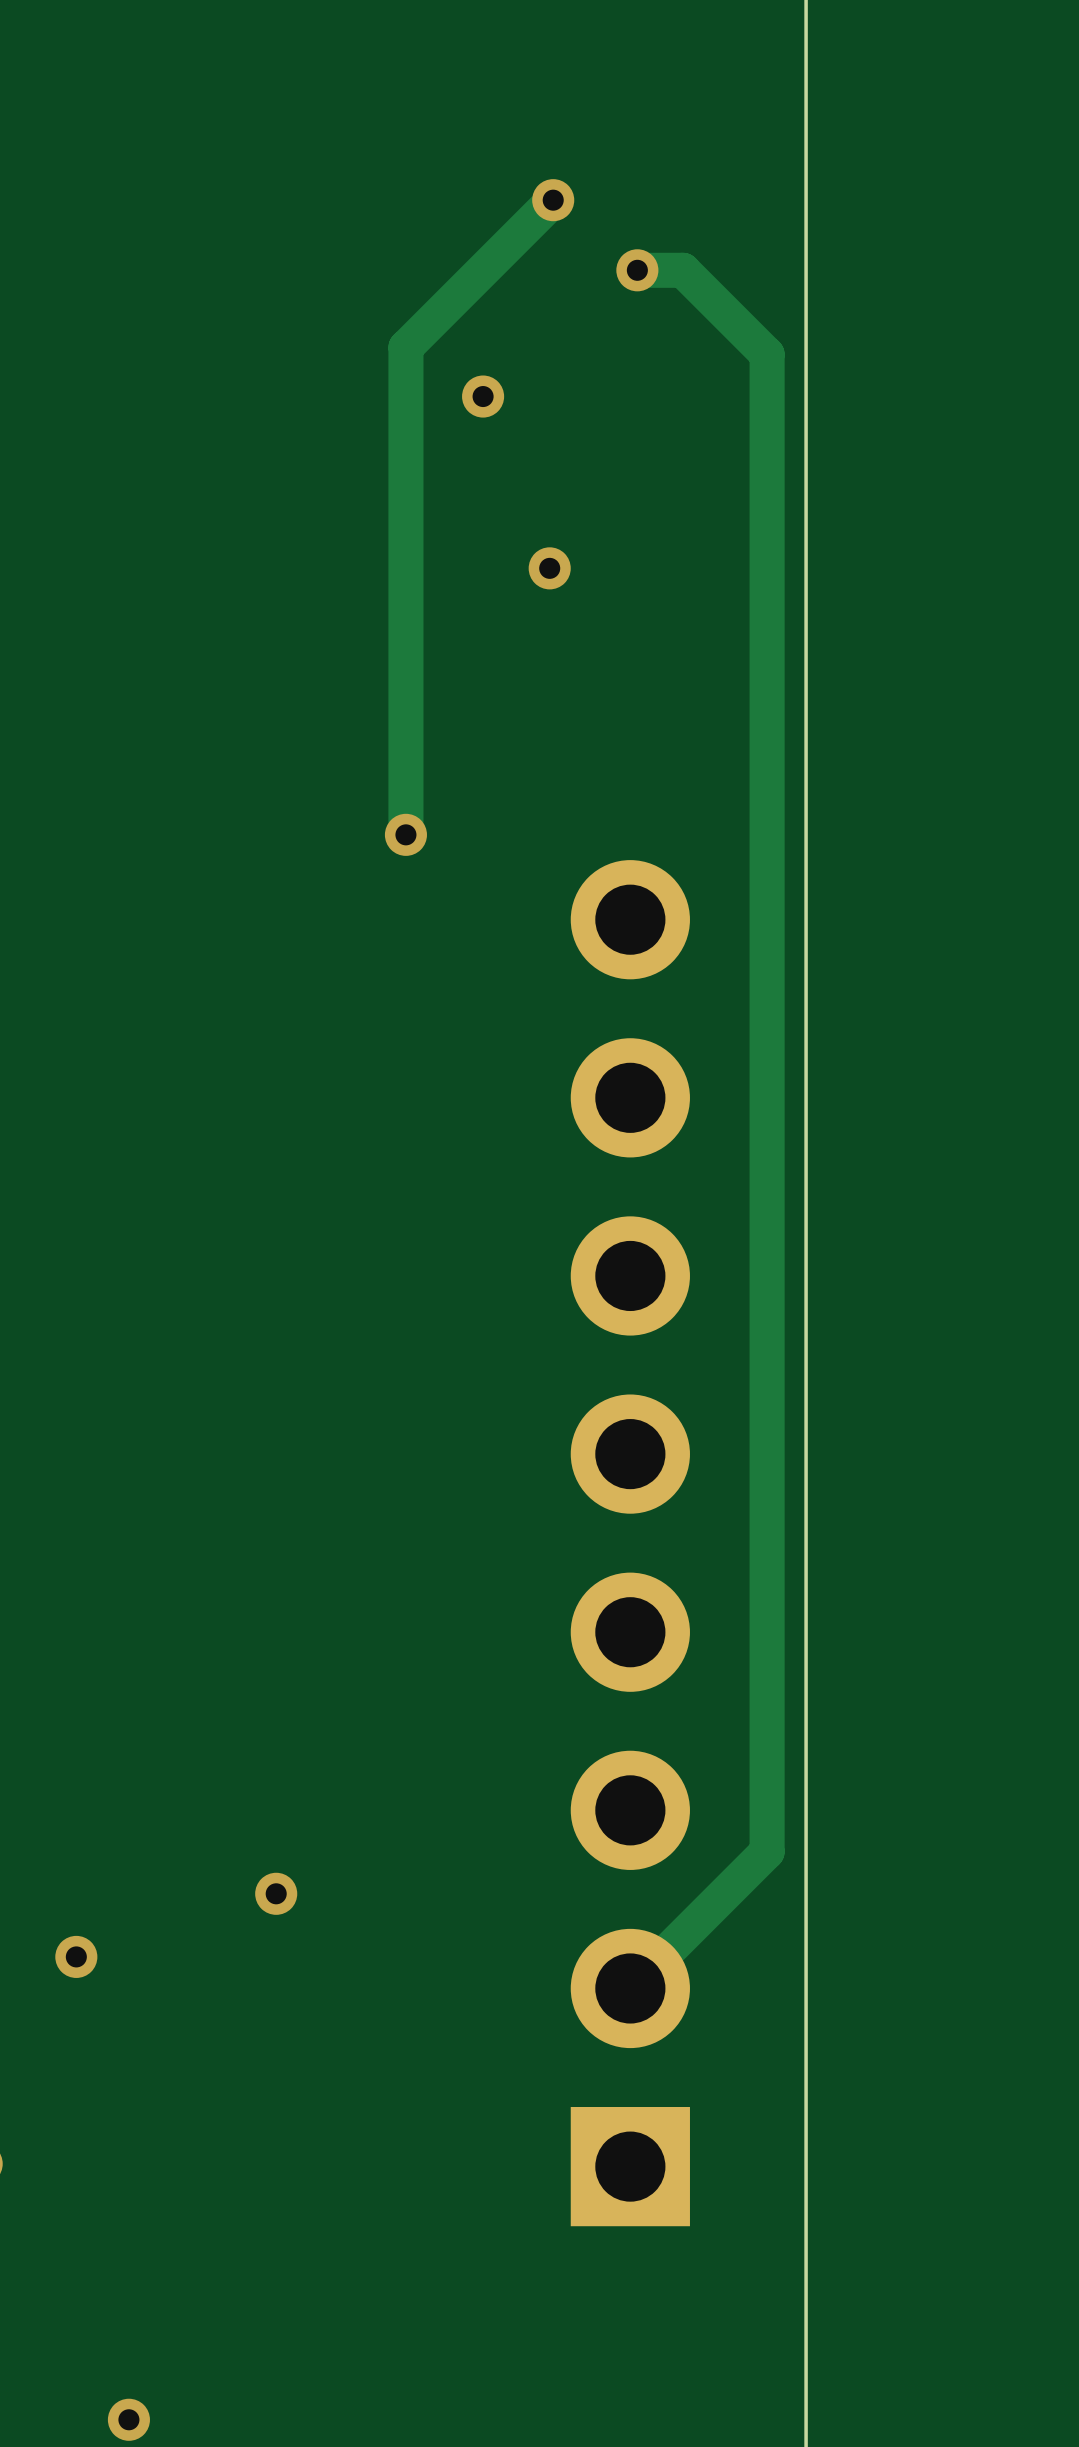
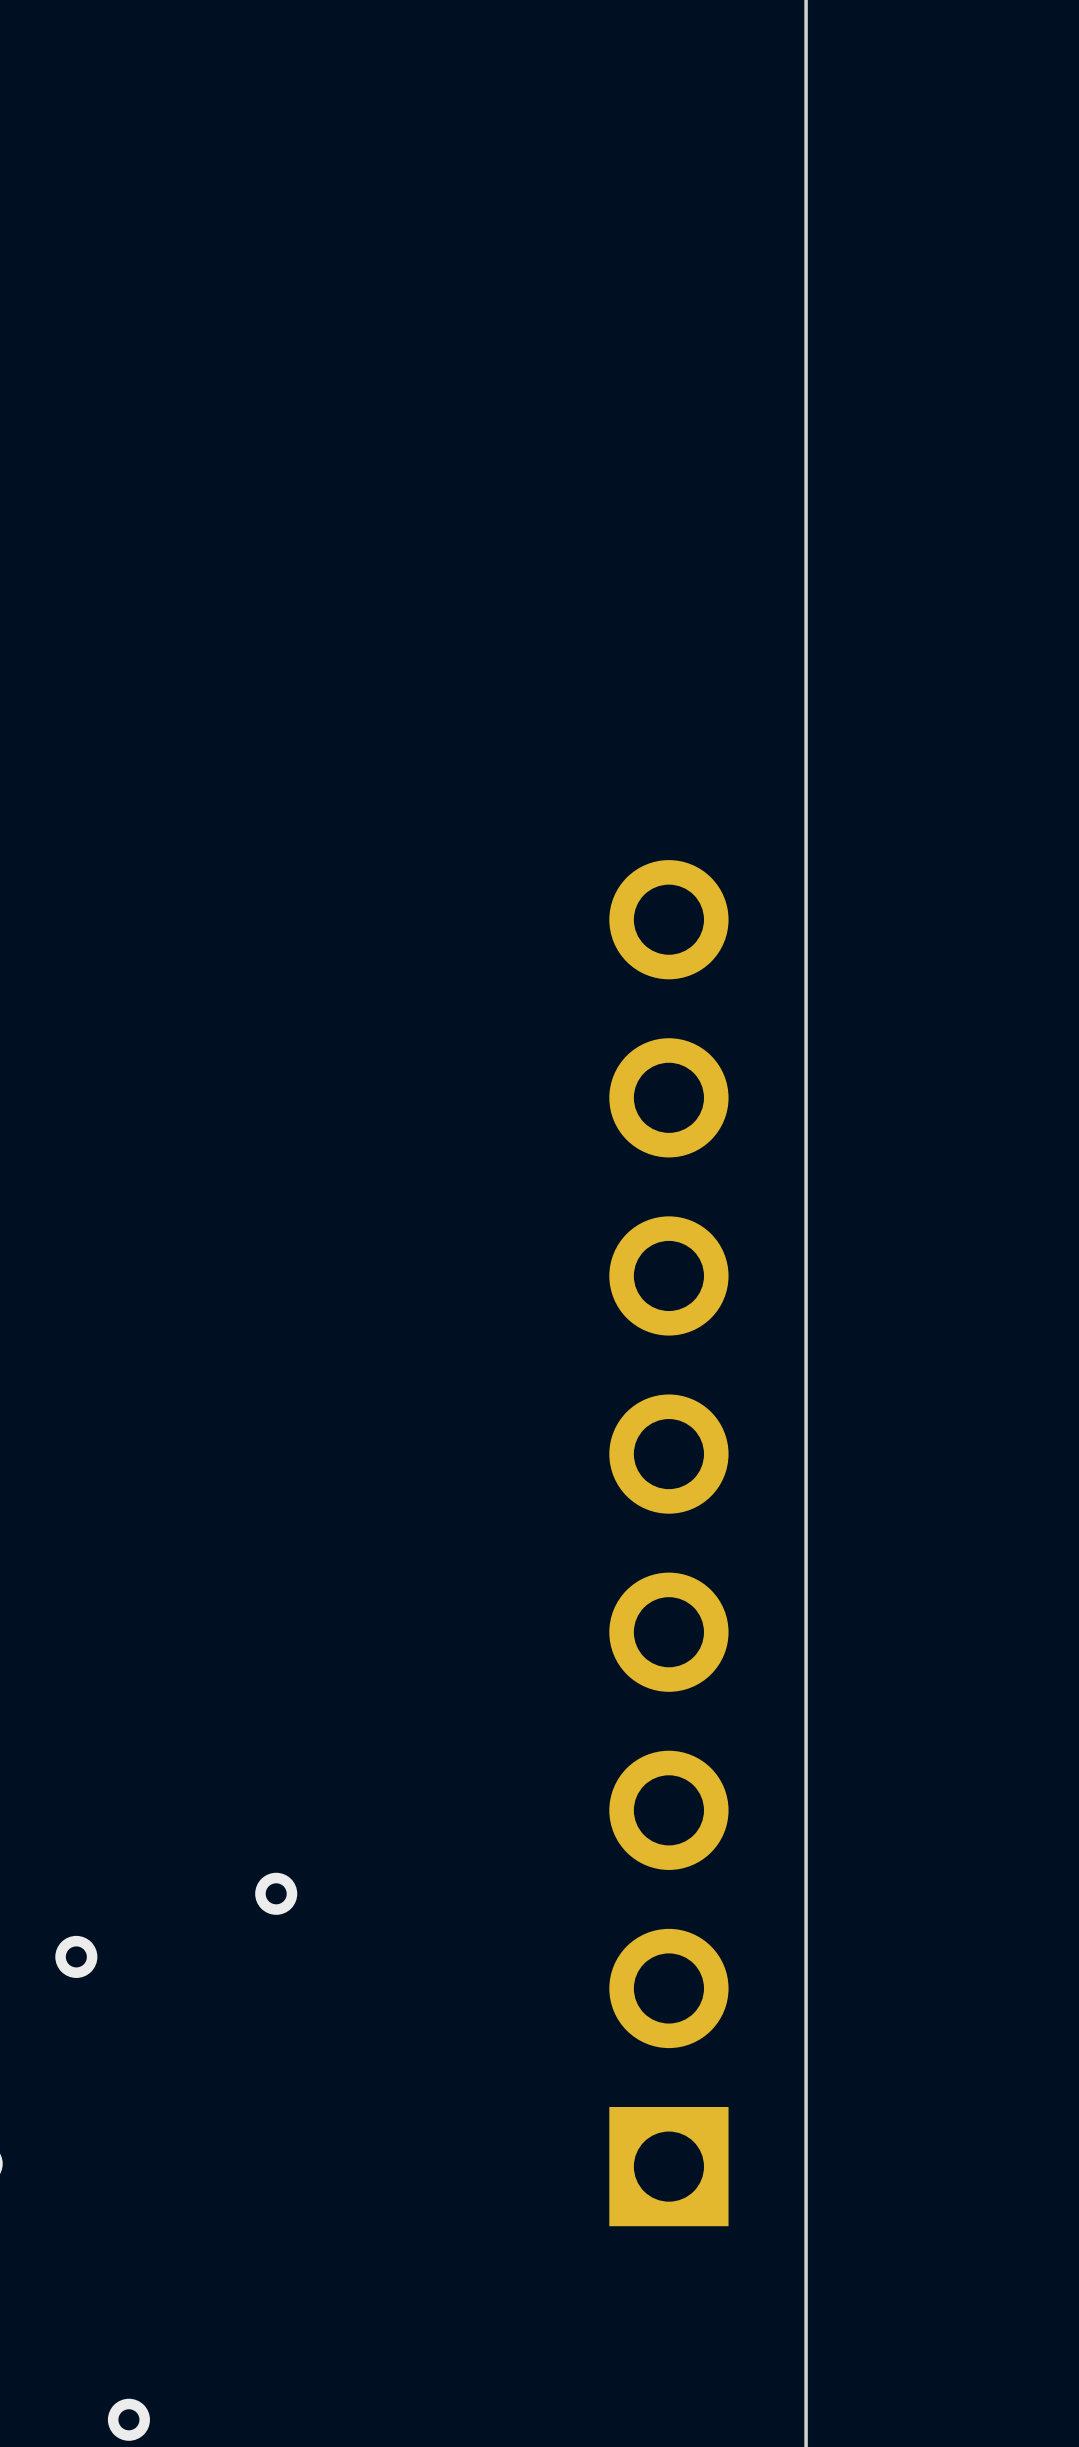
track: (553, 200) (405, 347) (405, 834) -> none
via: (553, 200) -> none
track: (637, 270) (682, 270) (767, 354) (767, 1851) (630, 1988) -> none
via: (637, 270) -> none
via: (483, 396) -> none
via: (549, 568) -> none
via: (405, 834) -> none
part position: (630, 1543) -> (668, 1543)

